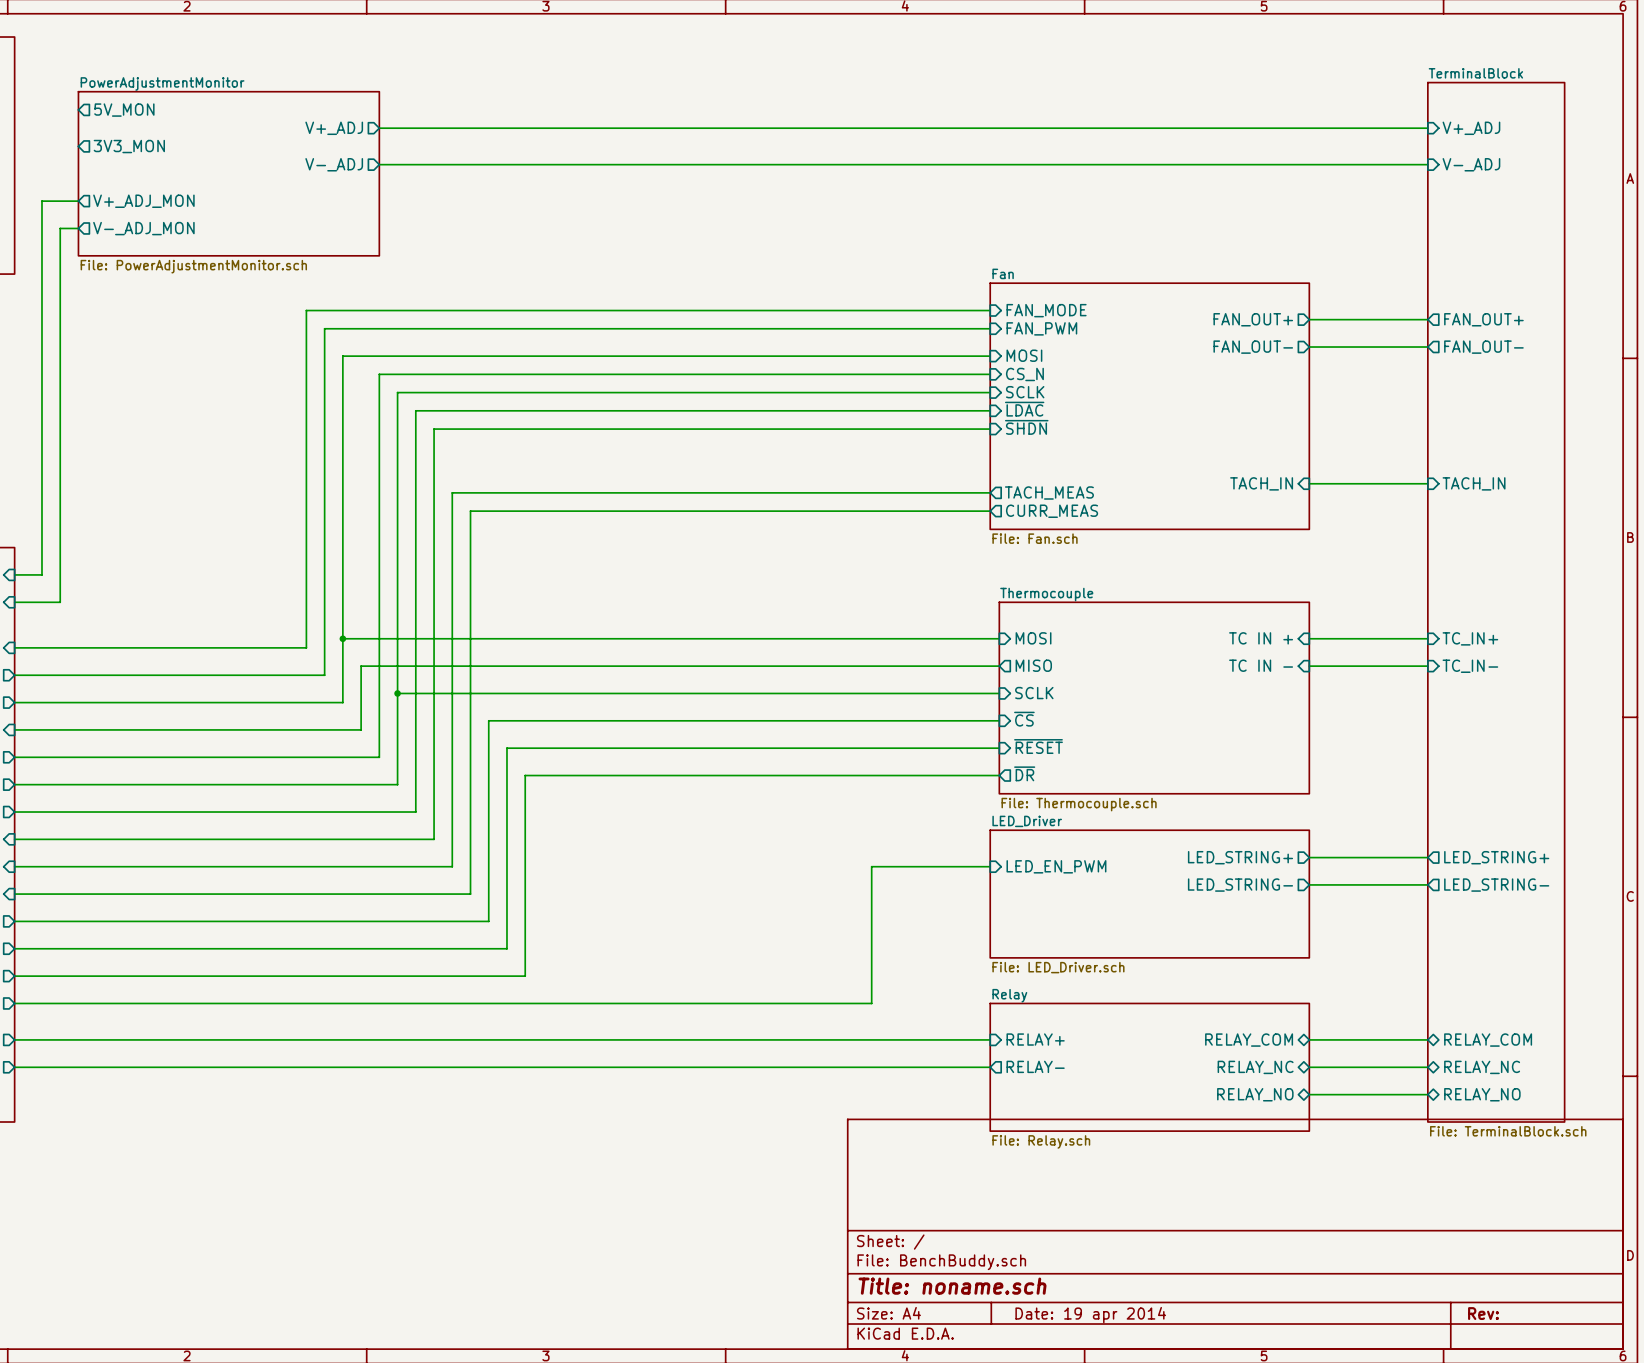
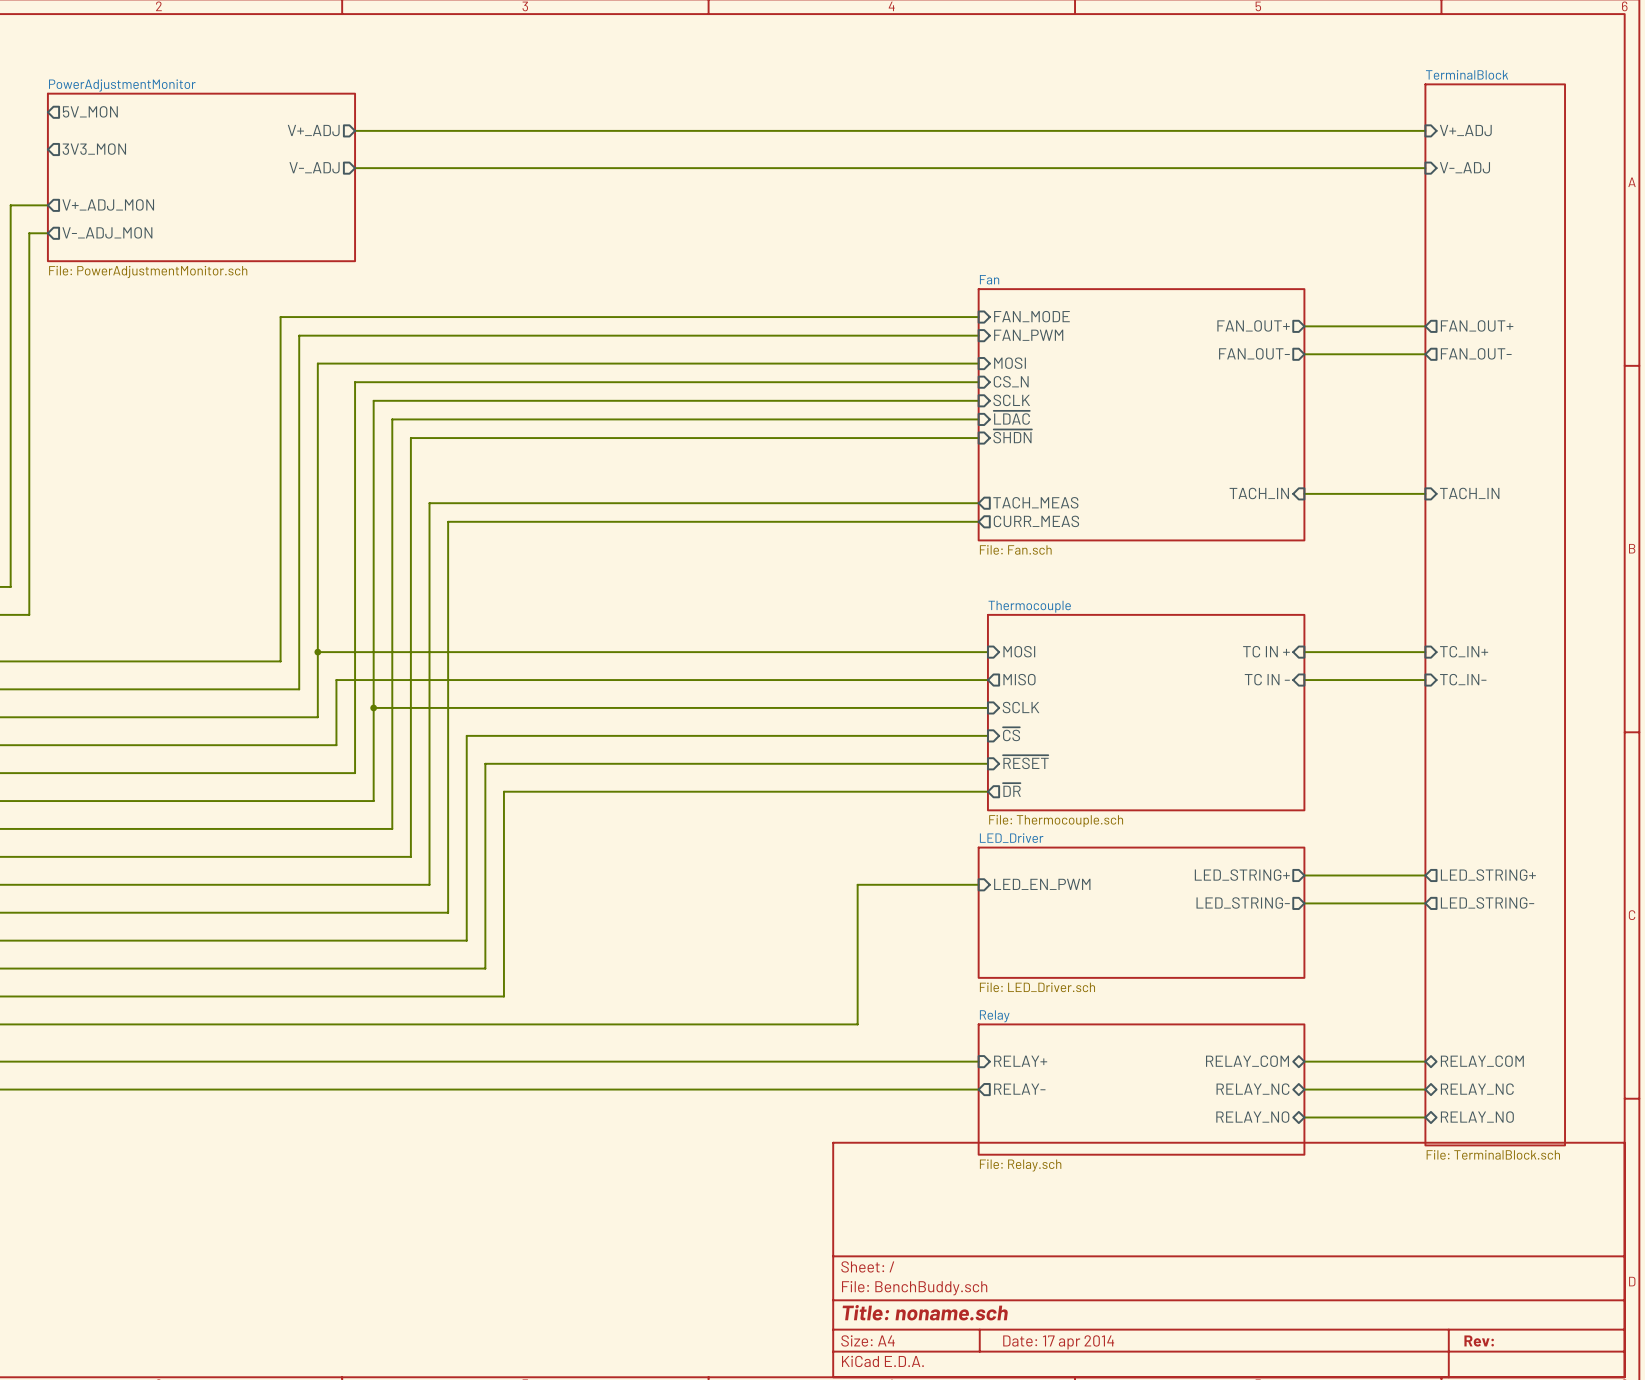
title block: Date: 19 apr 2014 (1090, 1315) -> Date: 17 apr 2014 (1058, 1342)

